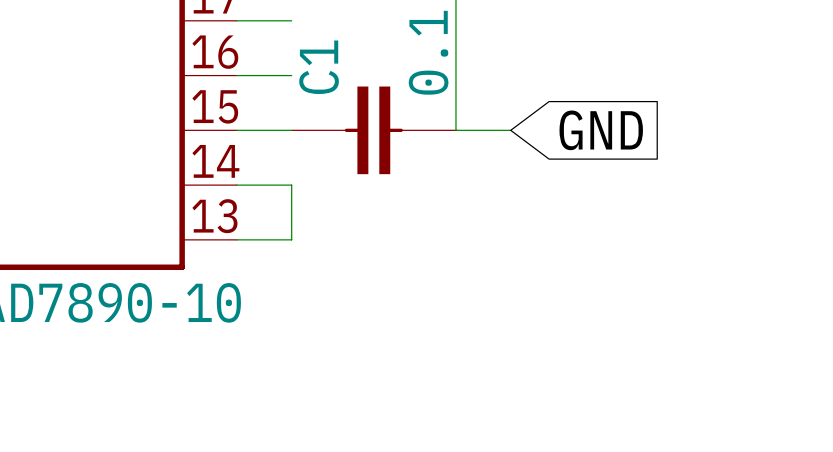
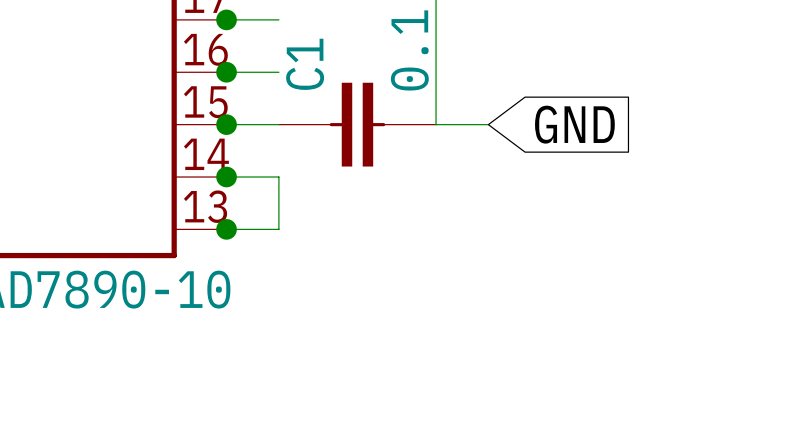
junction: none -> (226, 19)
junction: none -> (226, 72)
junction: none -> (226, 124)
junction: none -> (226, 177)
junction: none -> (226, 229)

